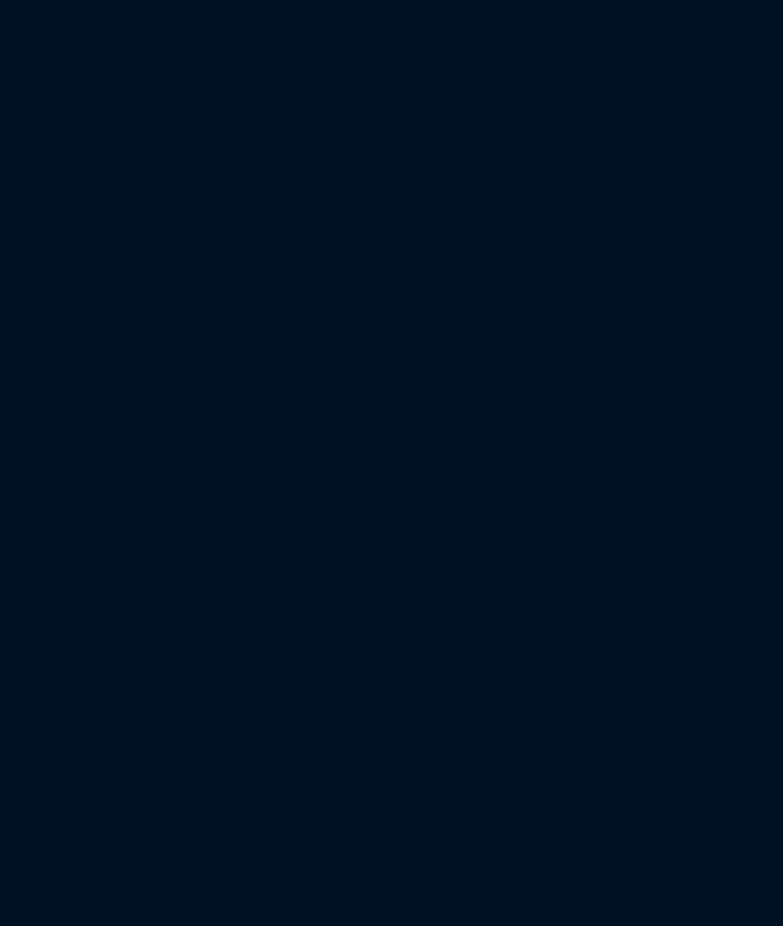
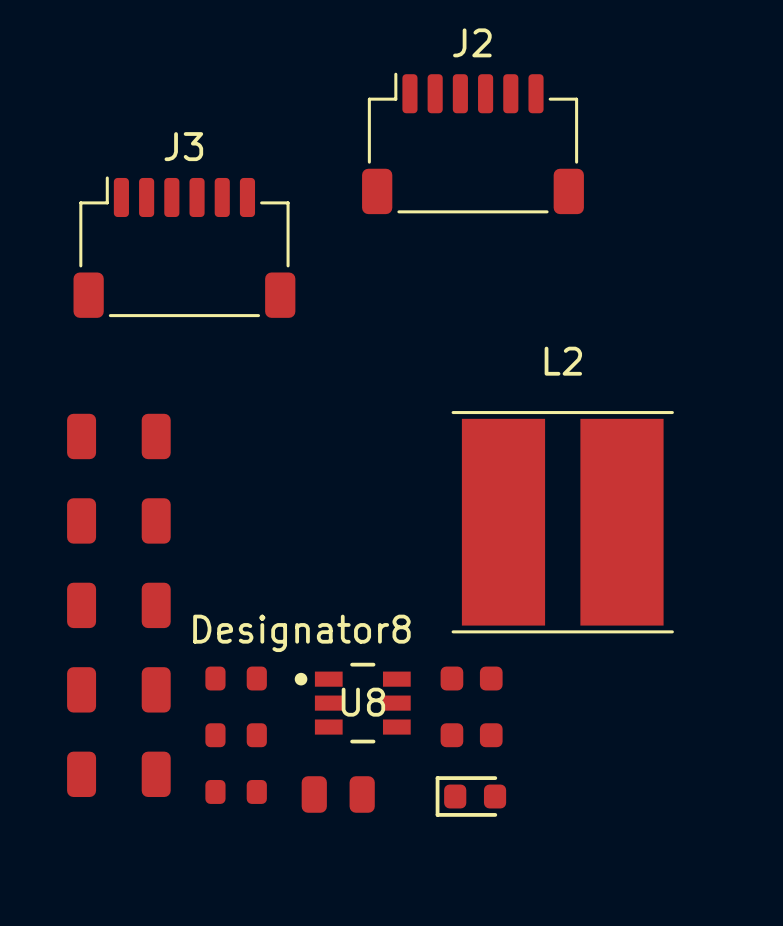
J2: none -> (472, 143)
J3: none -> (184, 247)
part: none -> (118, 436)
part: none -> (118, 520)
L2: none -> (562, 522)
part: none -> (118, 605)
part: none -> (236, 678)
part: none -> (471, 678)
part: none -> (118, 689)
U8: none -> (352, 703)
part: none -> (236, 735)
part: none -> (471, 735)
part: none -> (118, 774)
part: none -> (236, 791)
part: none -> (338, 794)
part: none -> (470, 796)

